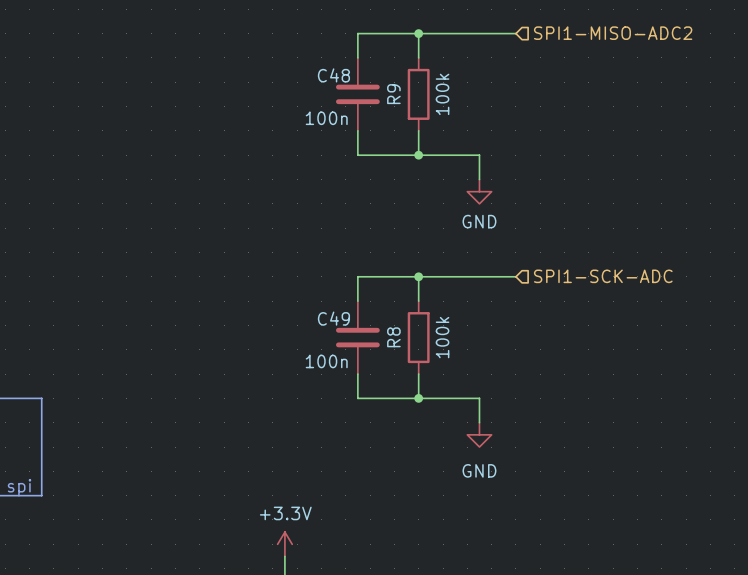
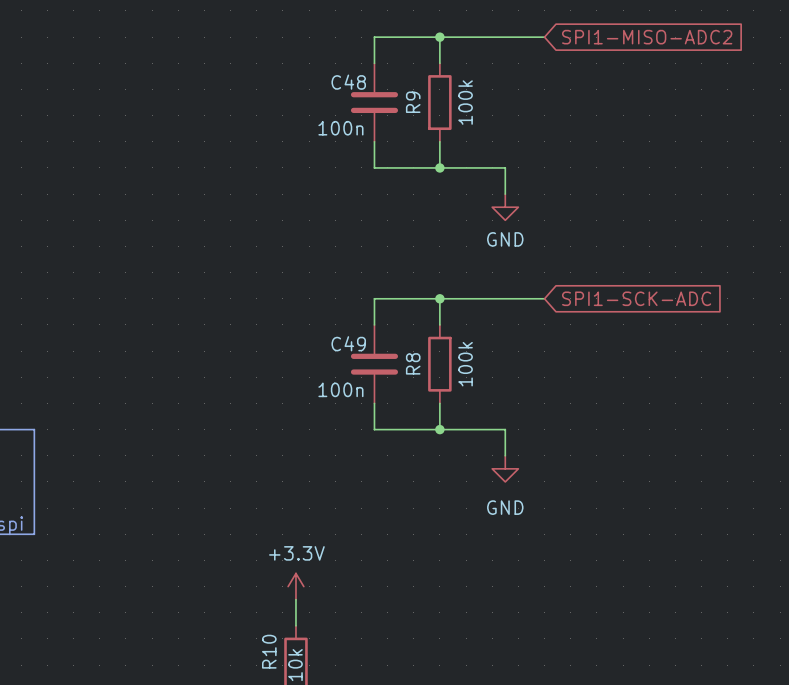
global label: none -> SPI1-MISO-ADC2 (647, 37)
hierarchical label: SPI1-MISO-ADC2 (613, 33) -> none
global label: none -> SPI1-SCK-ADC (636, 298)
hierarchical label: SPI1-SCK-ADC (603, 276) -> none

